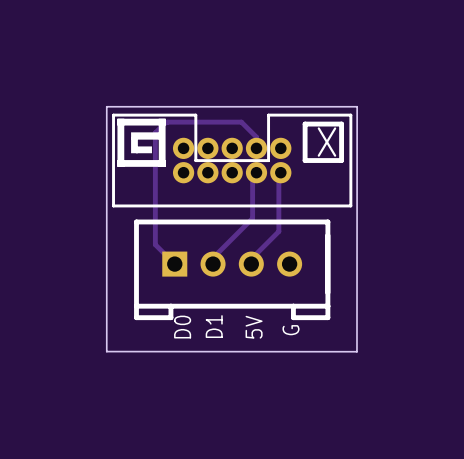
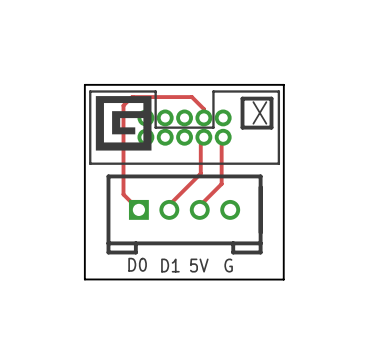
drawing: [117, 118, 166, 167] -> none
drawing: none -> [95, 96, 152, 151]
drawing shape: [117, 160, 166, 167] -> [112, 126, 121, 128]
text rotation: 0° (214, 326) -> 90° clockwise (170, 265)
text rotation: 0° (182, 327) -> 90° clockwise (137, 264)
text rotation: 0° (254, 327) -> 90° clockwise (199, 265)
text rotation: 0° (291, 330) -> 90° clockwise (228, 265)

